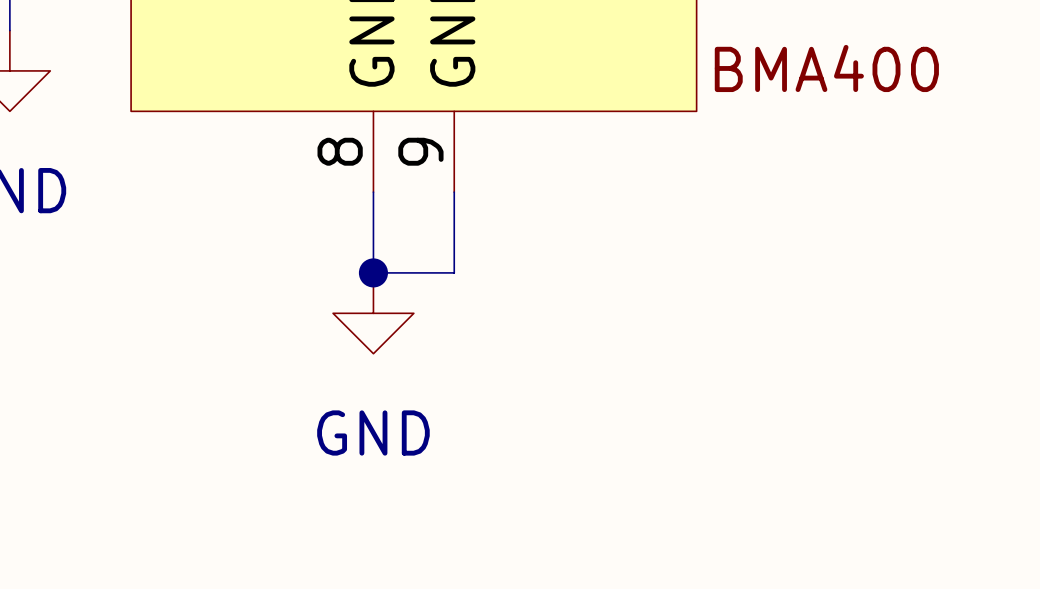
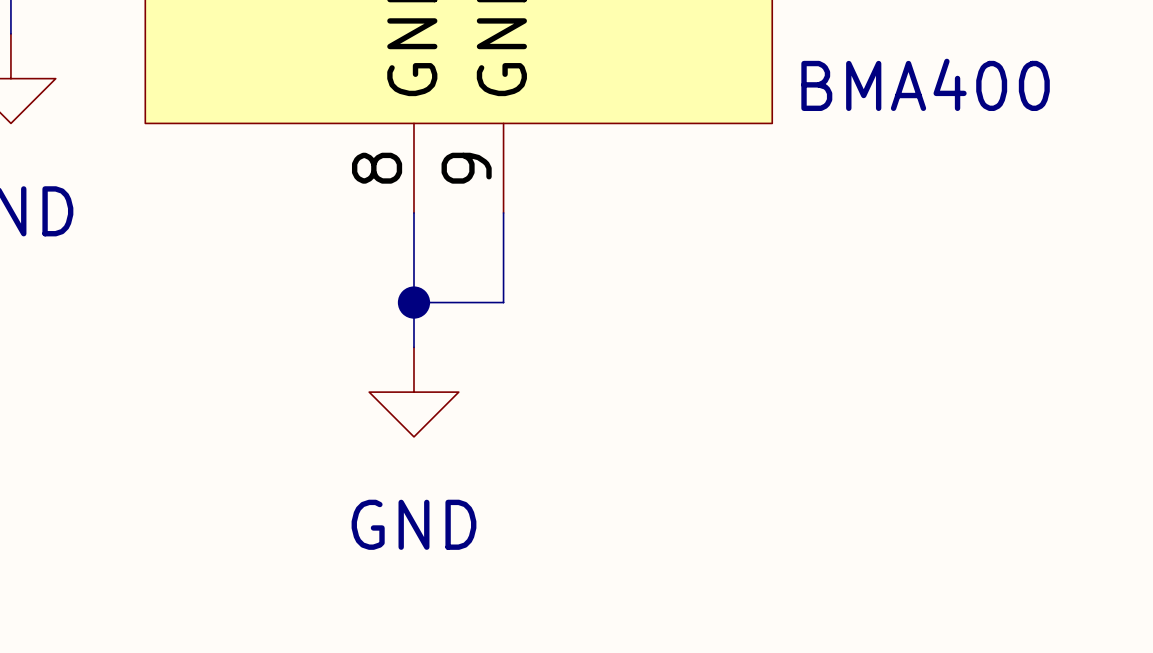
part text: BMA400 (826, 68) -> none
part value: none -> BMA400 (925, 84)
power symbol position: GND (373, 313) -> GND (413, 392)

